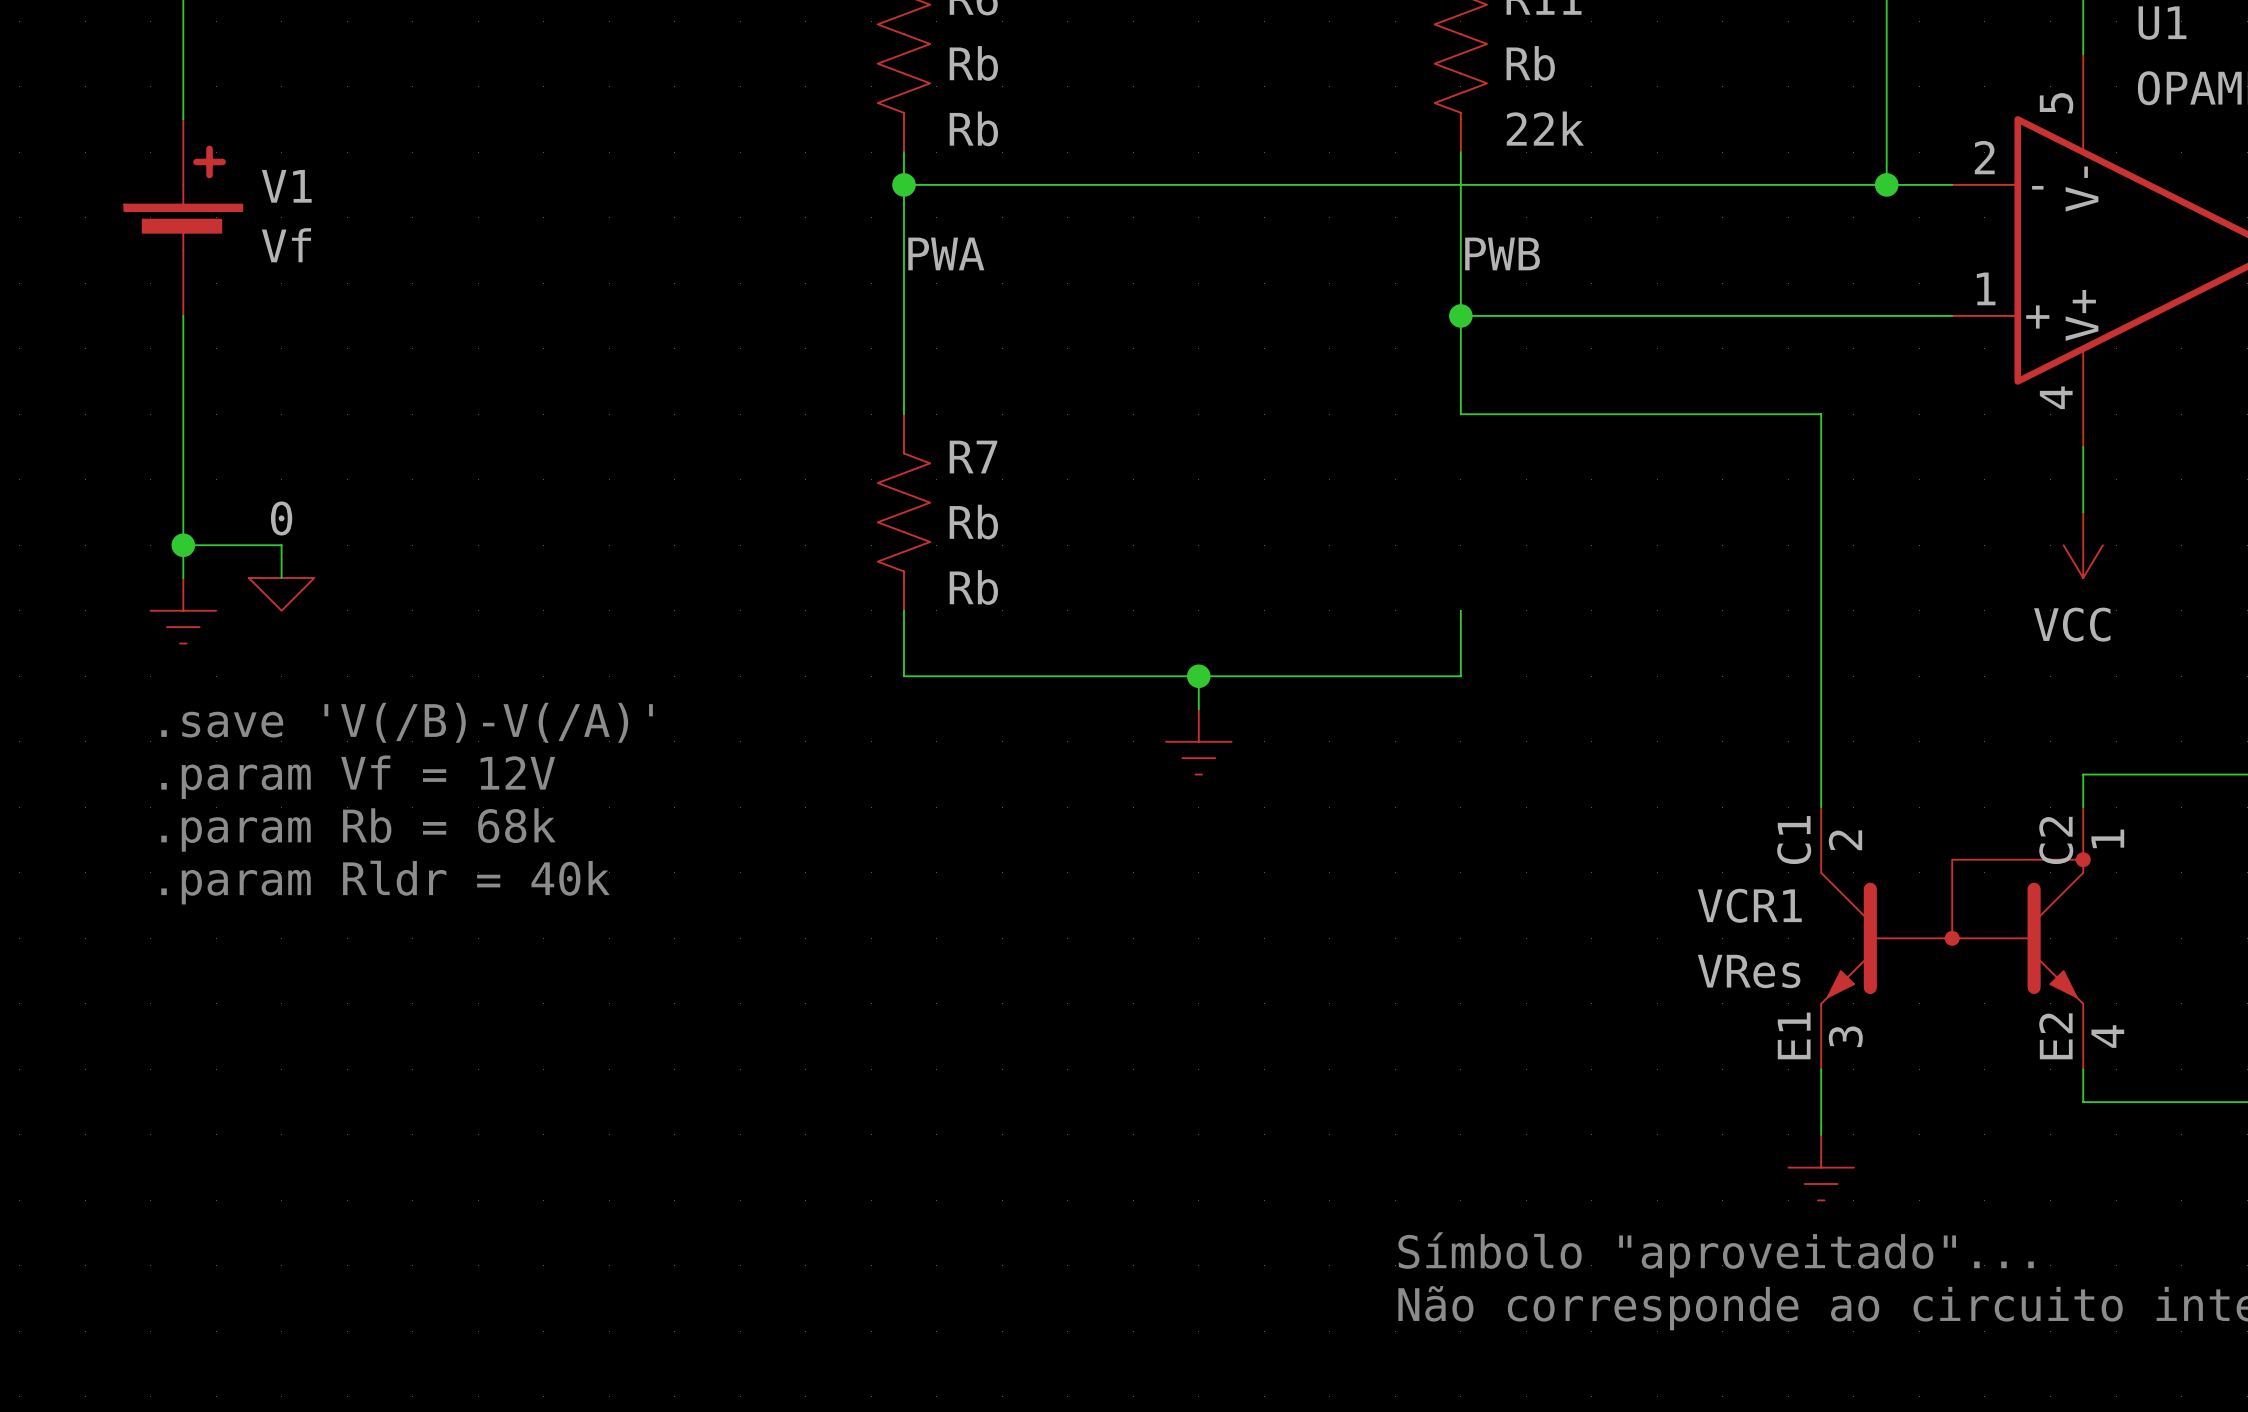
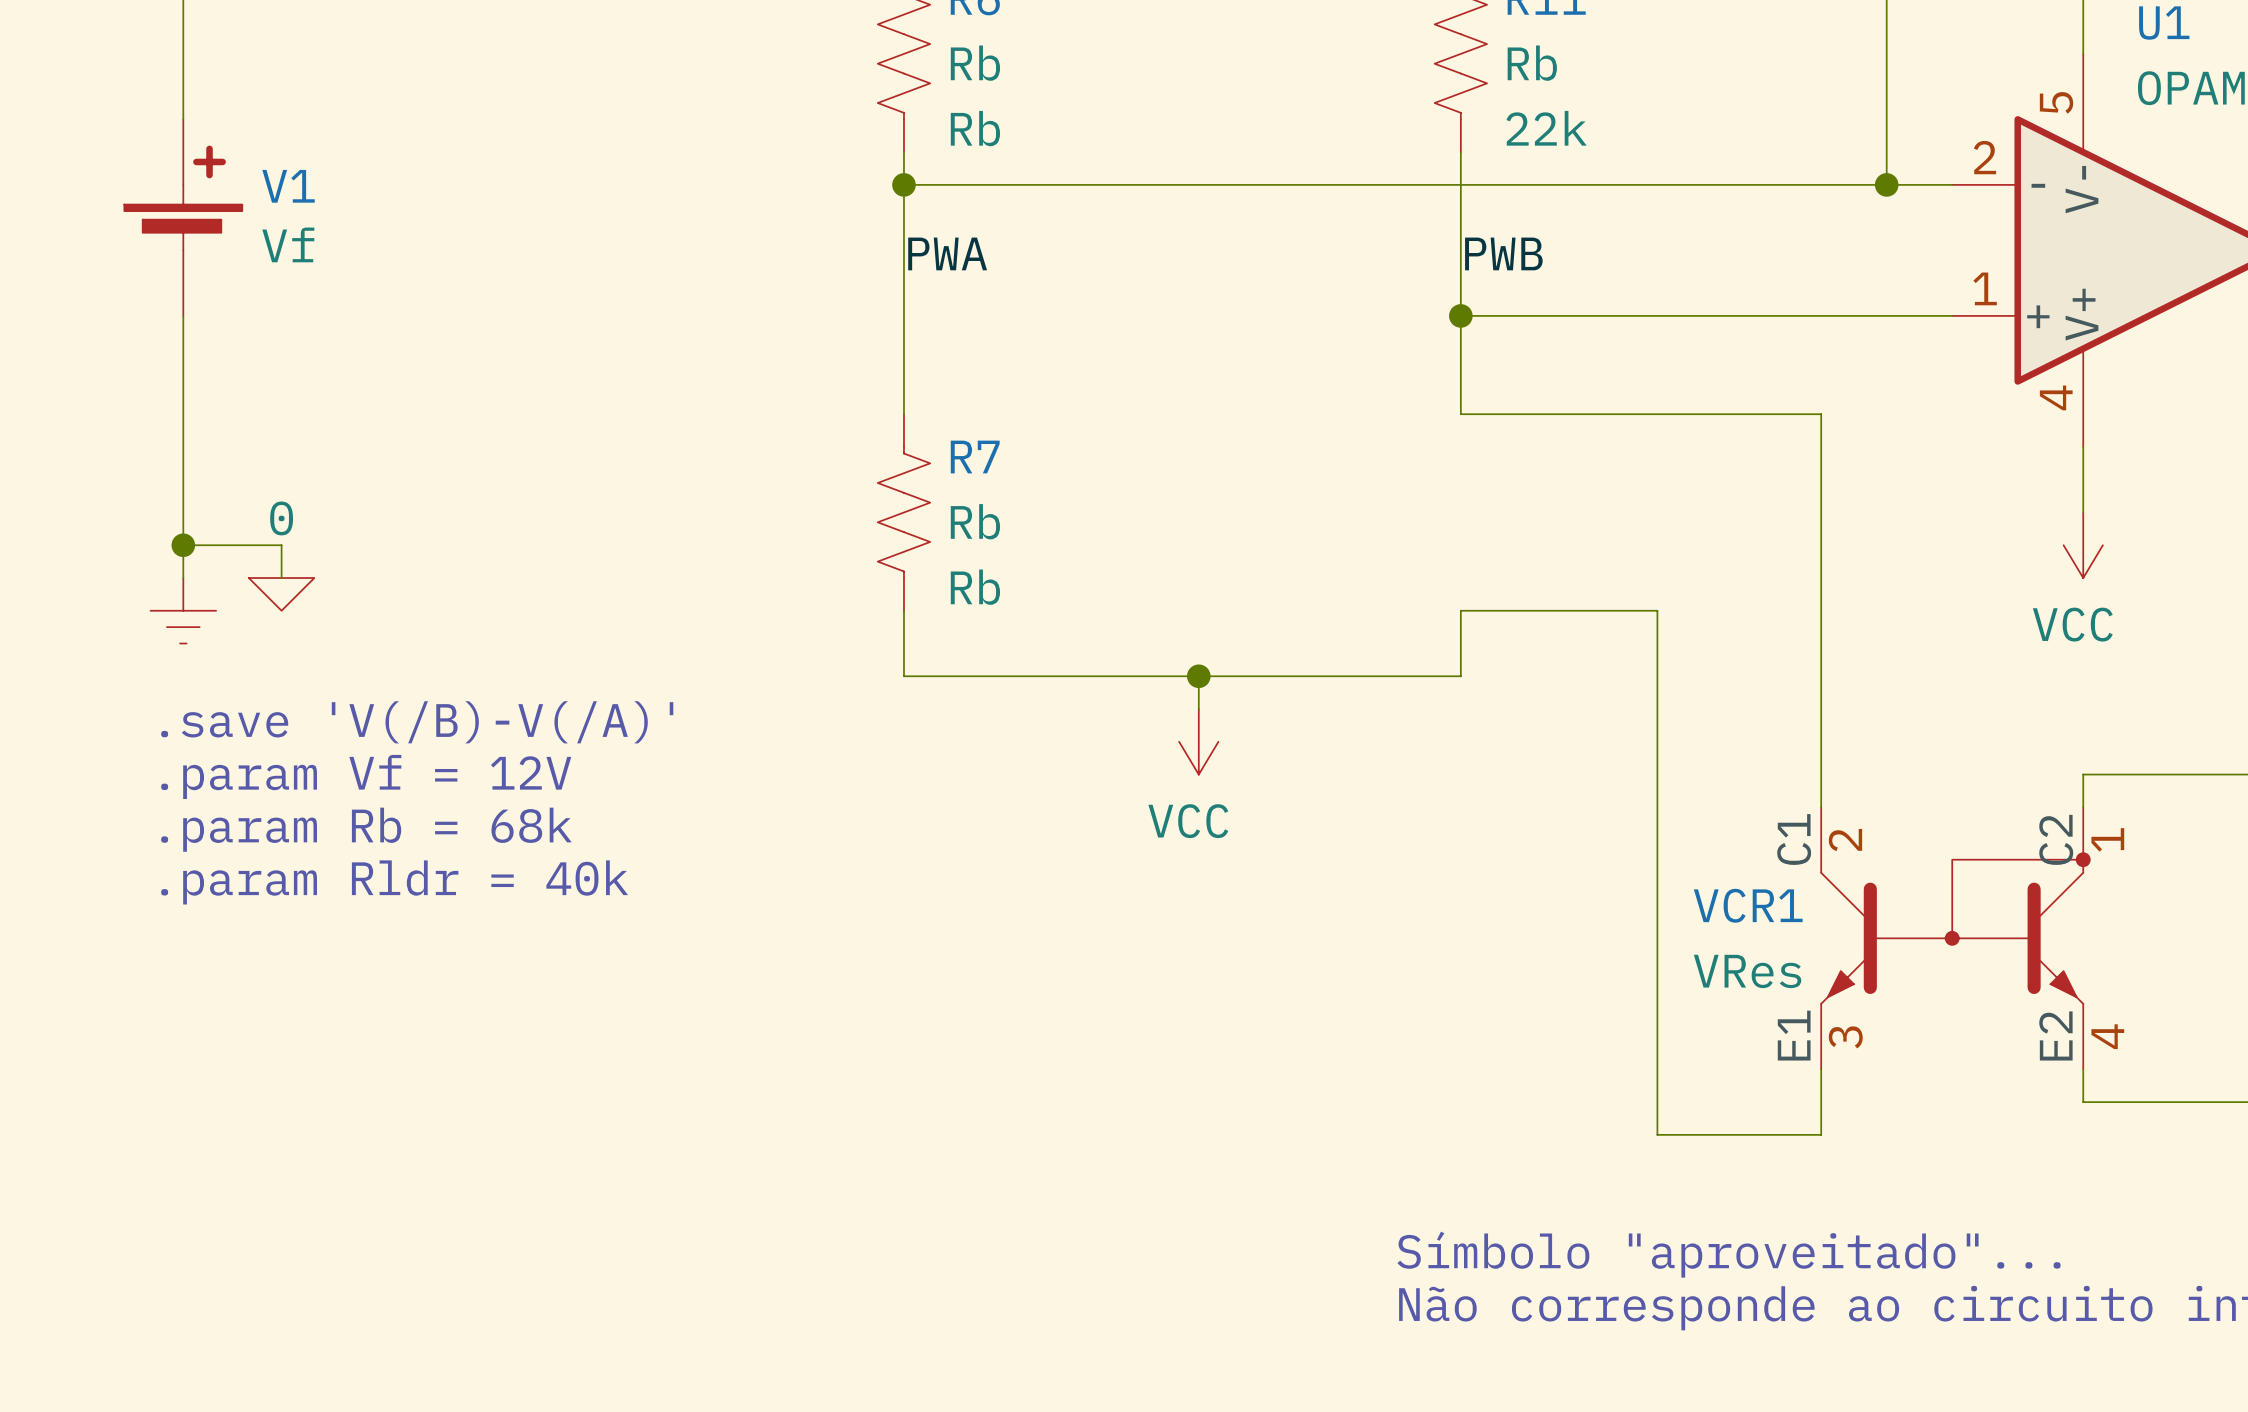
wire: none -> (1460, 610) (1657, 610) (1657, 1134) (1821, 1134)
power symbol shape: [1166, 709, 1232, 775] -> [1179, 709, 1219, 775]
power symbol text: none -> VCC (1188, 821)
power symbol: (1821, 1167) -> none

